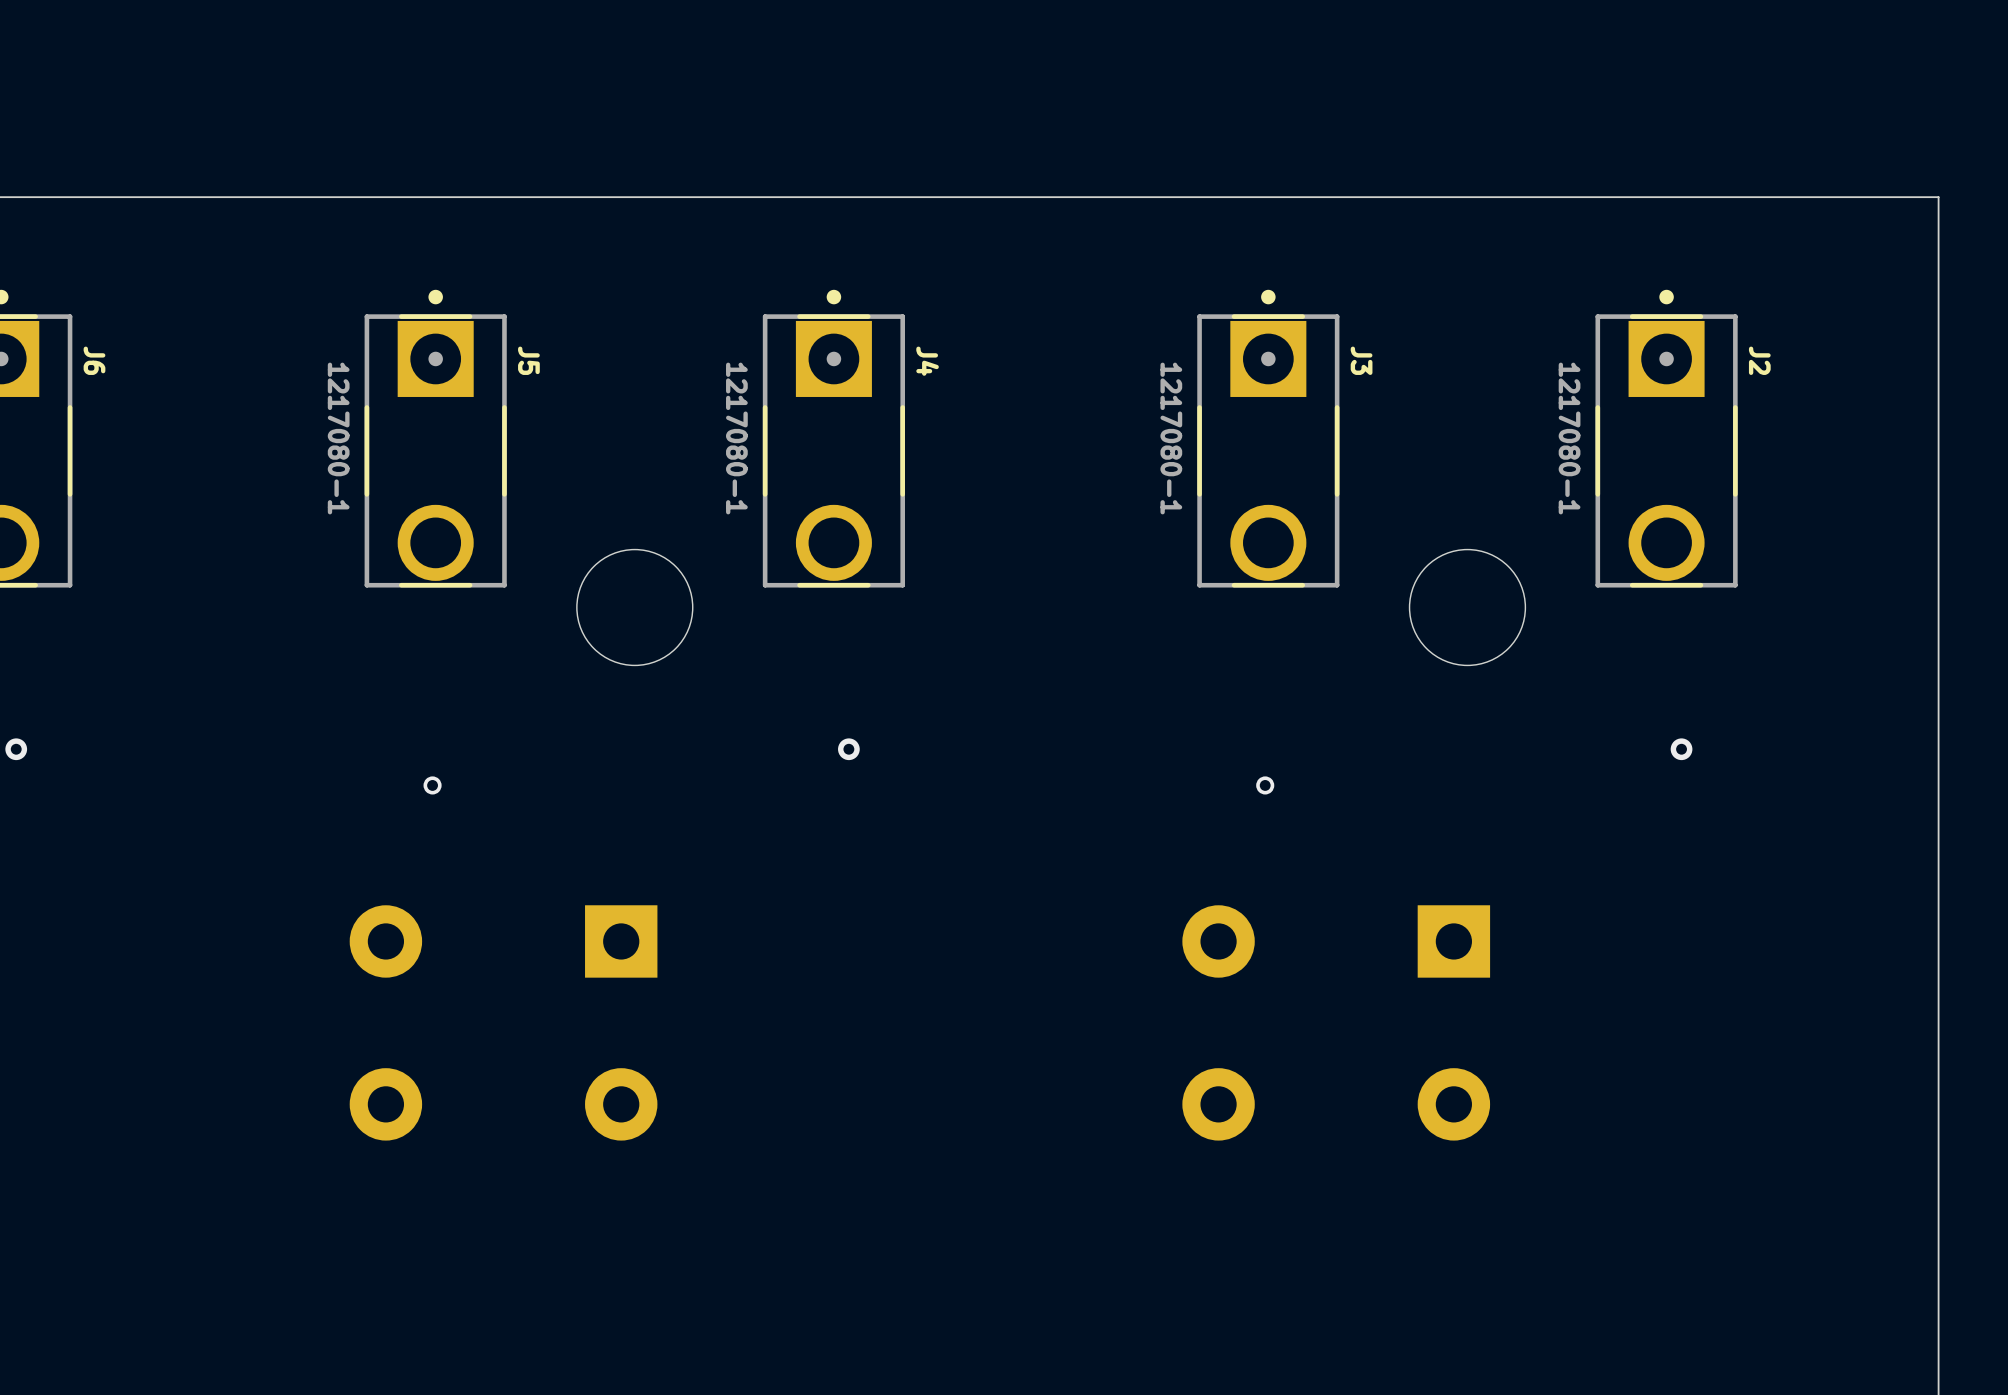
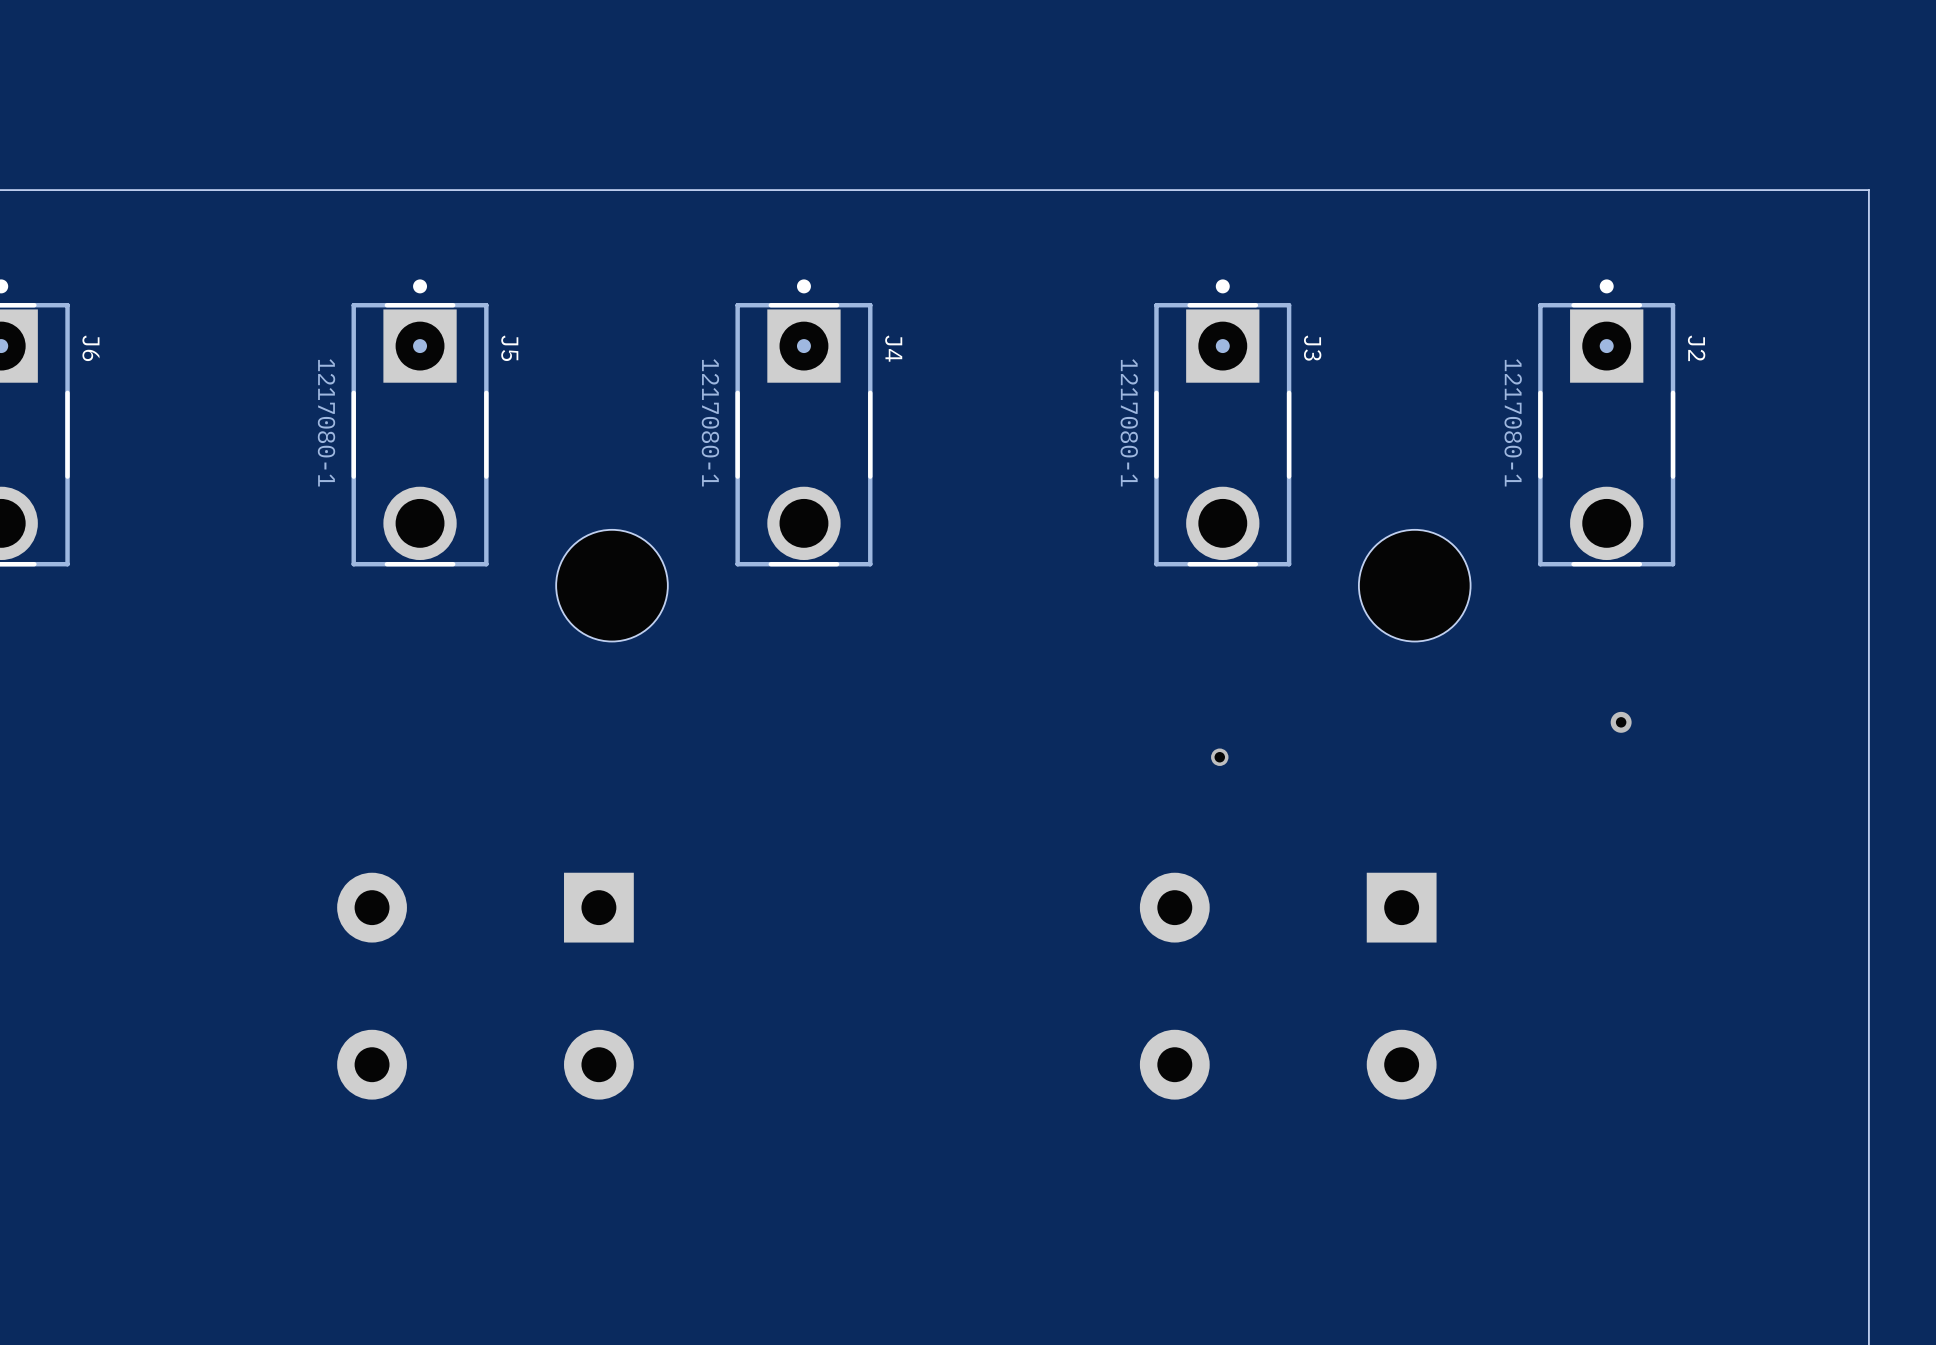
via: (16, 749) -> none
via: (848, 749) -> none
via: (432, 785) -> none

